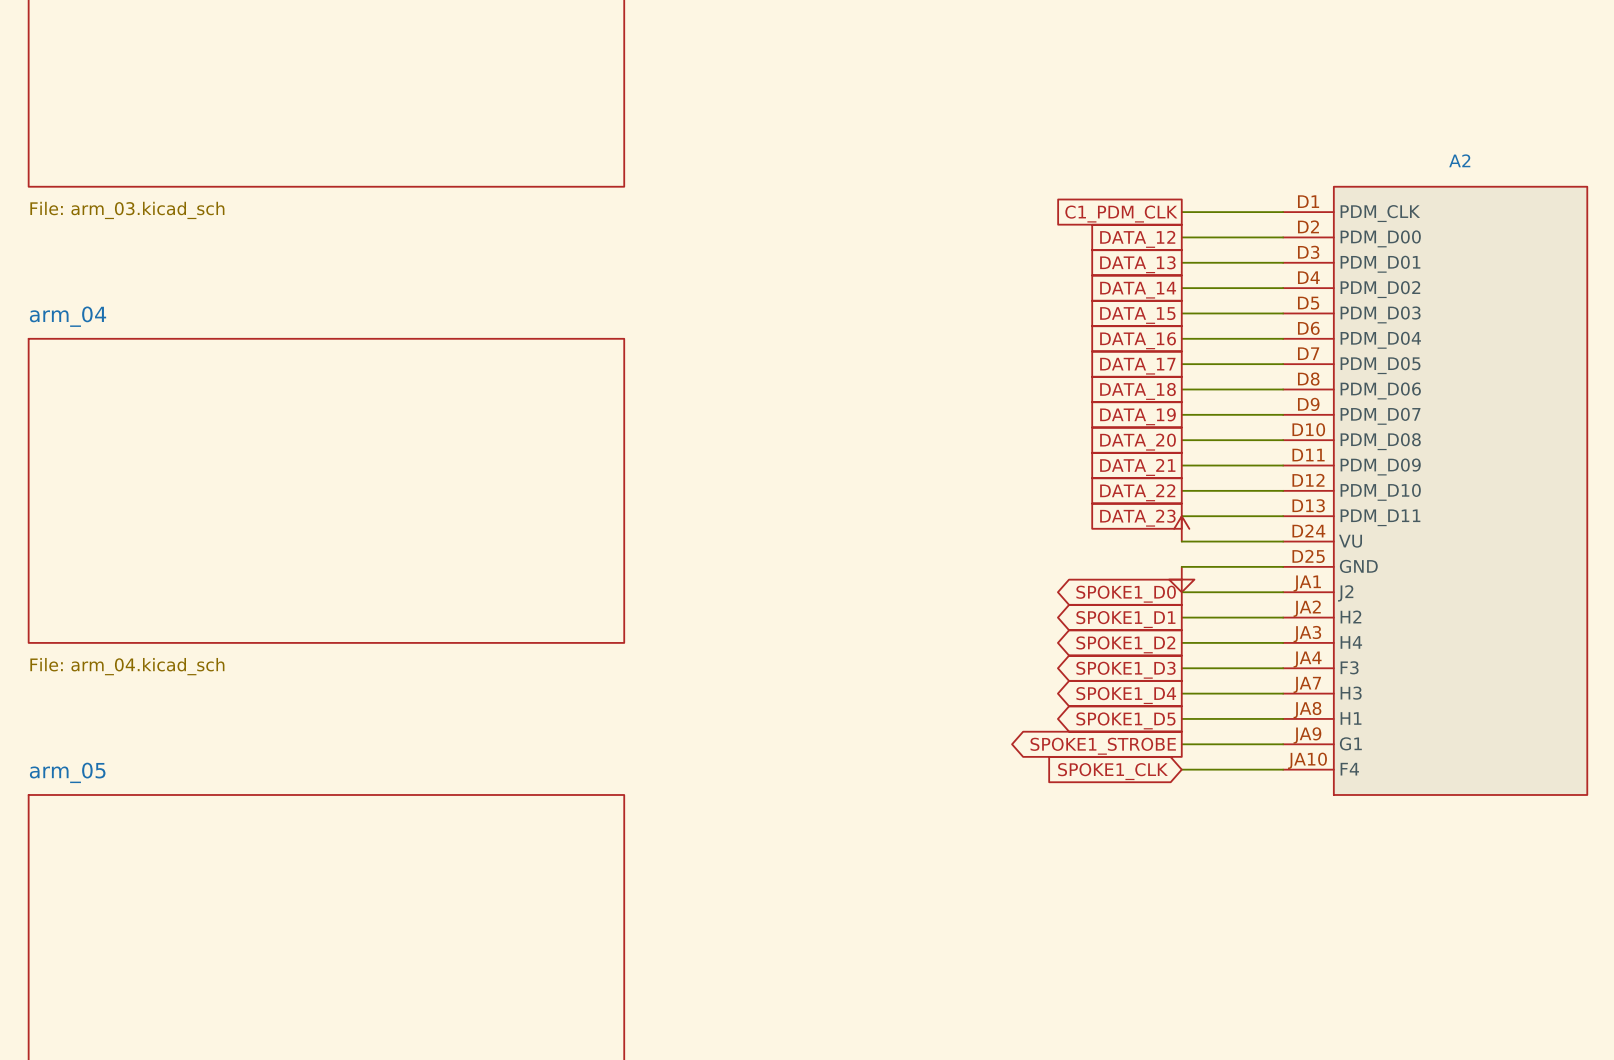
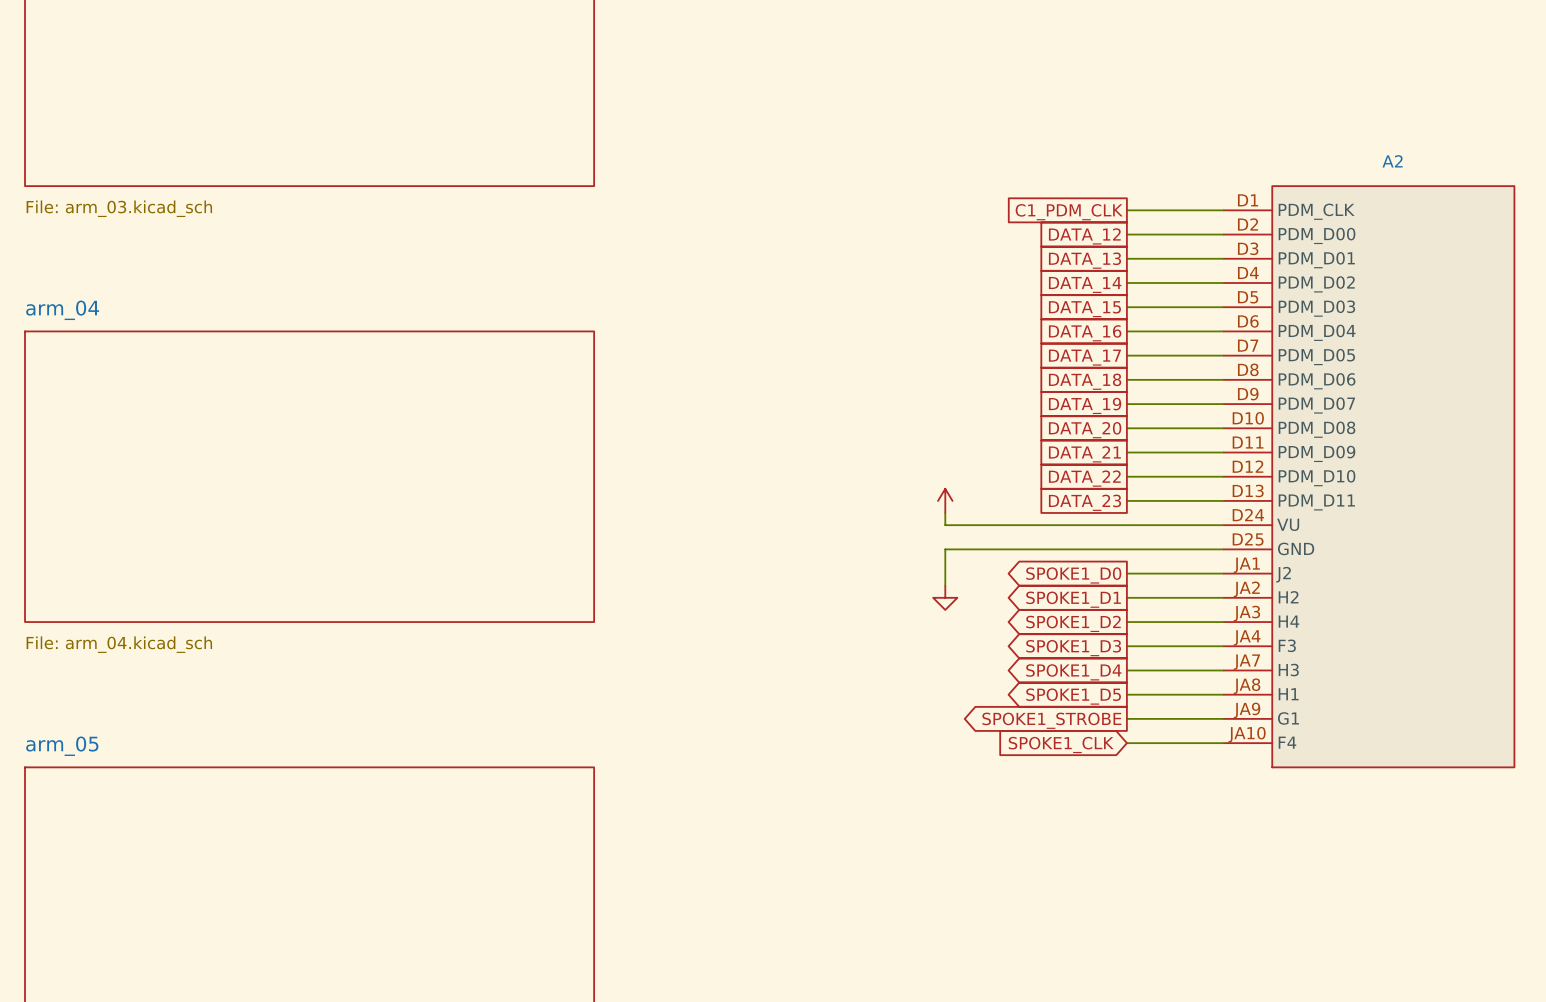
wire: none -> (945, 513) (945, 525) (1126, 525)
power symbol position: (1181, 528) -> (945, 500)
wire: none -> (1126, 549) (945, 549) (945, 585)
power symbol position: (1181, 579) -> (945, 597)

